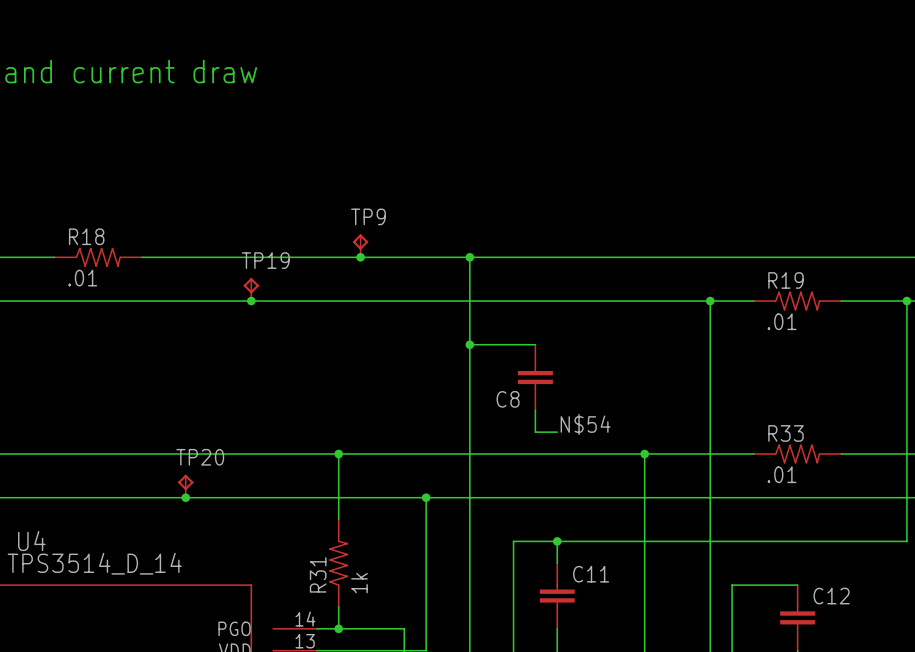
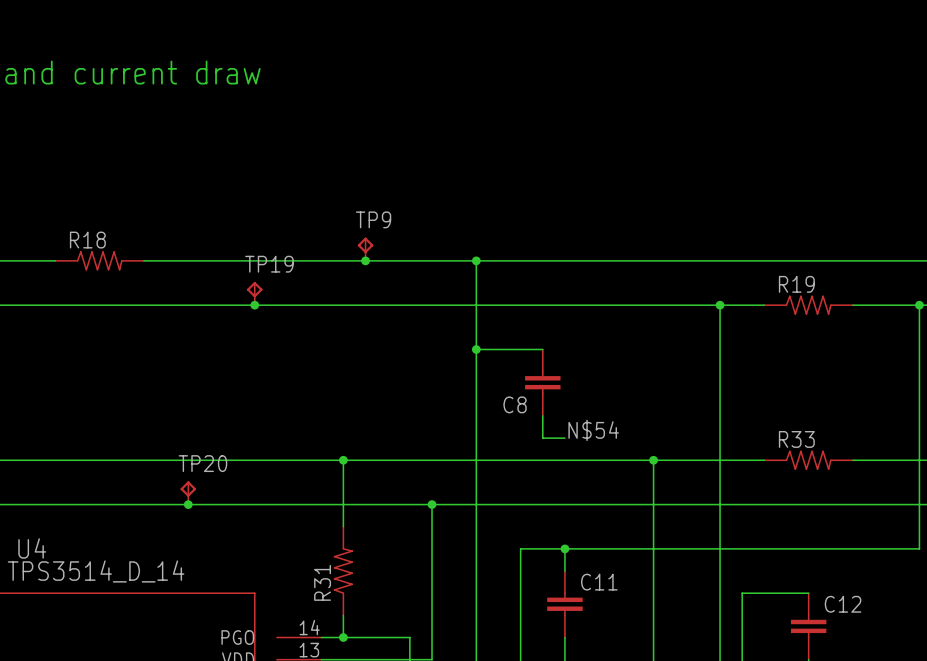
R18 value: .01 (82, 278) -> none
R19 value: .01 (782, 321) -> none
R33 value: .01 (782, 474) -> none
R31 value: 1k (359, 583) -> none

